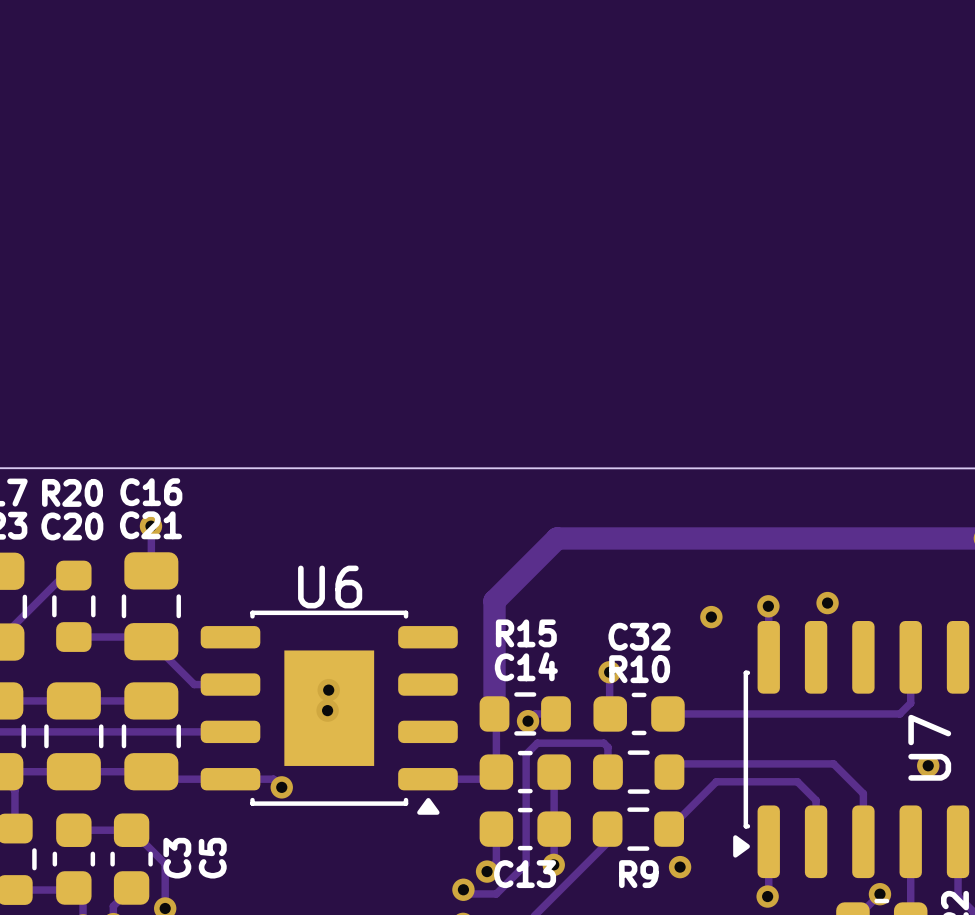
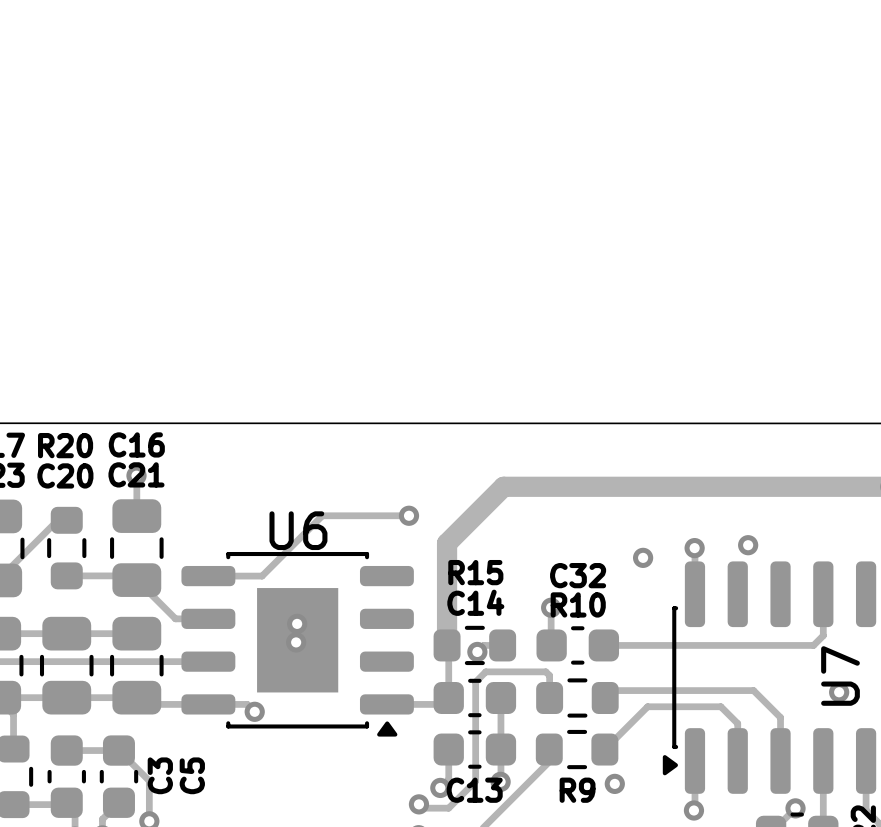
track: none -> (408, 515) (322, 515) (262, 576) (208, 576)
via: none -> (408, 515)

